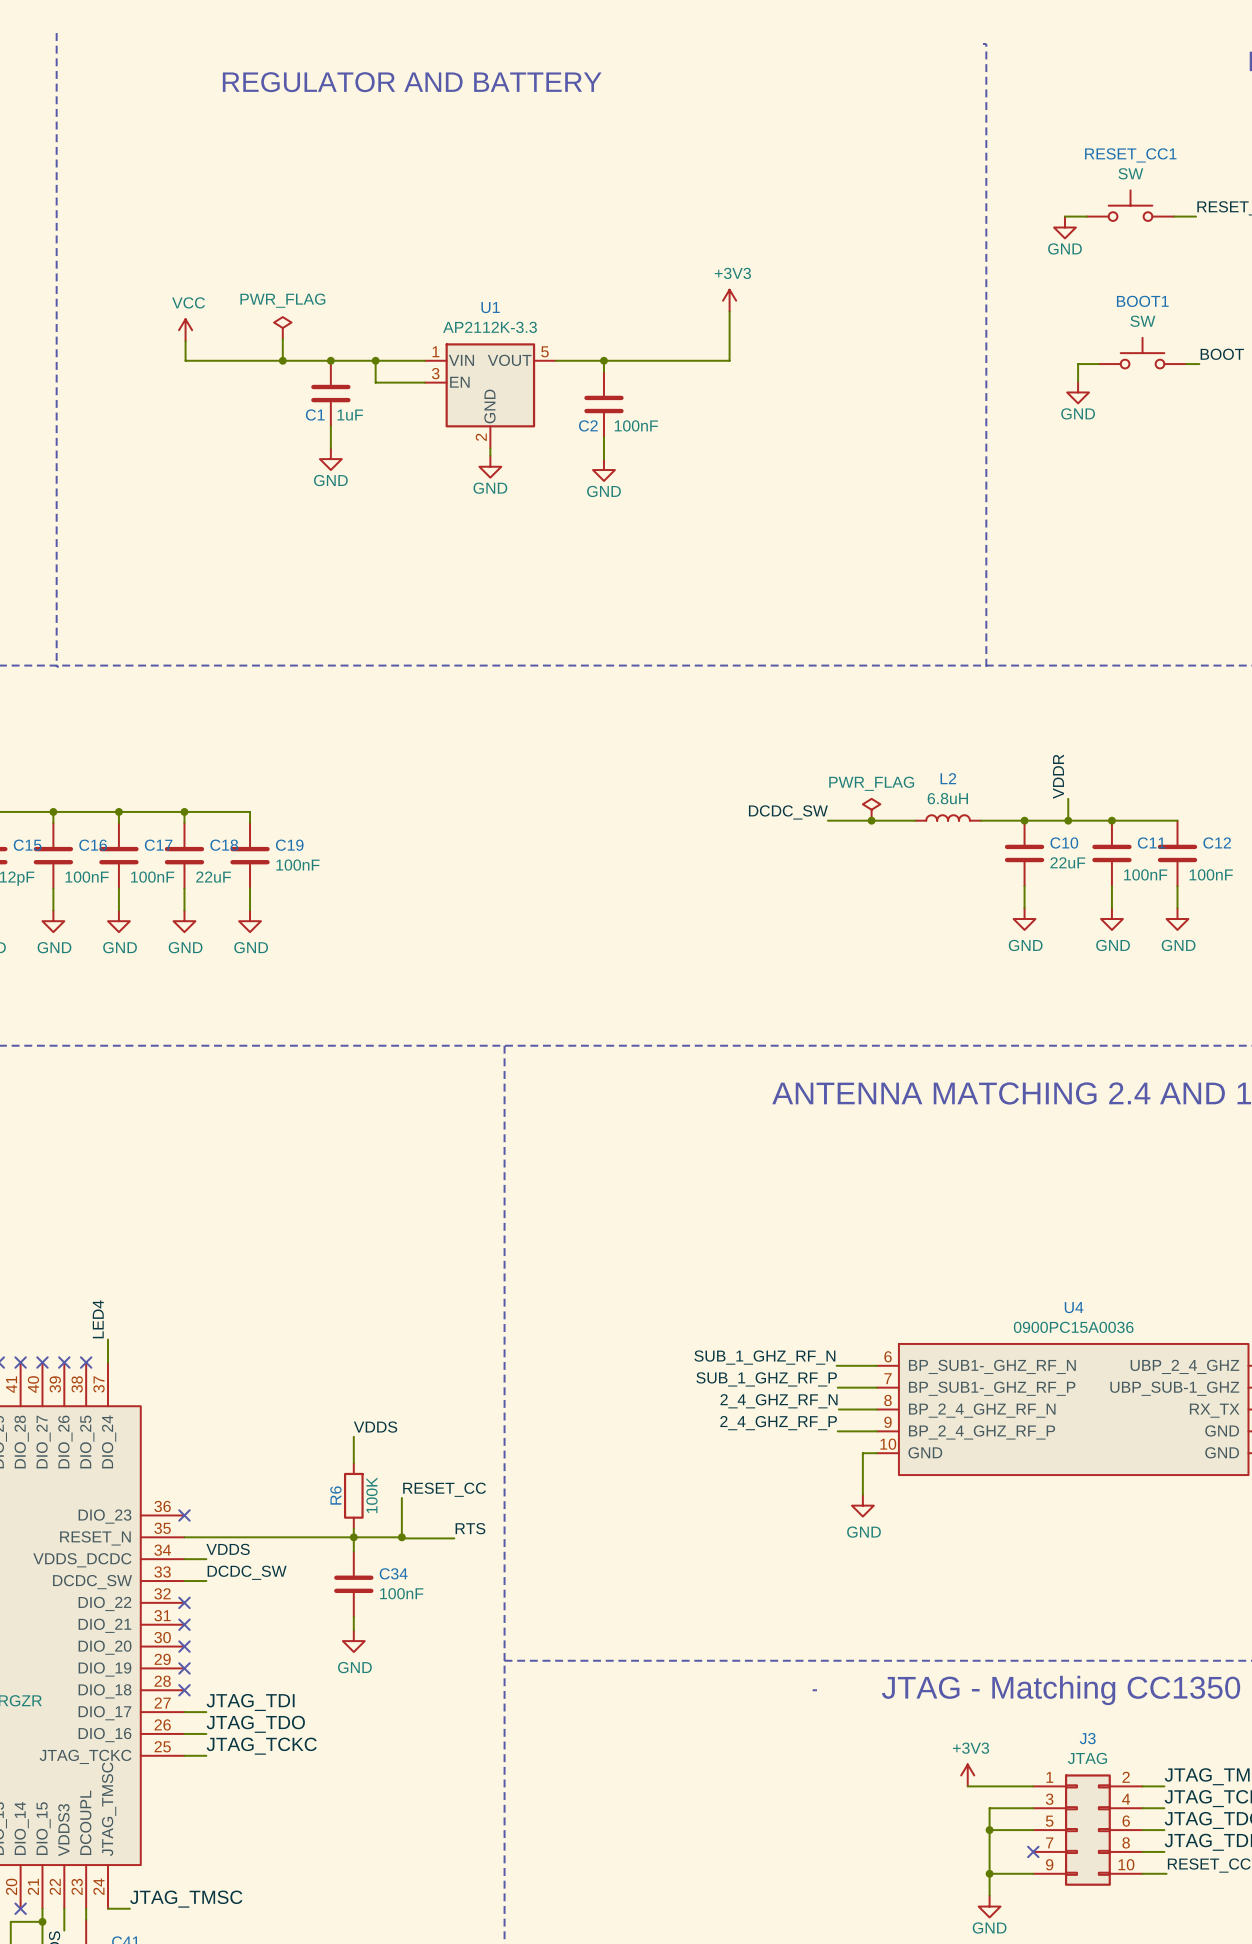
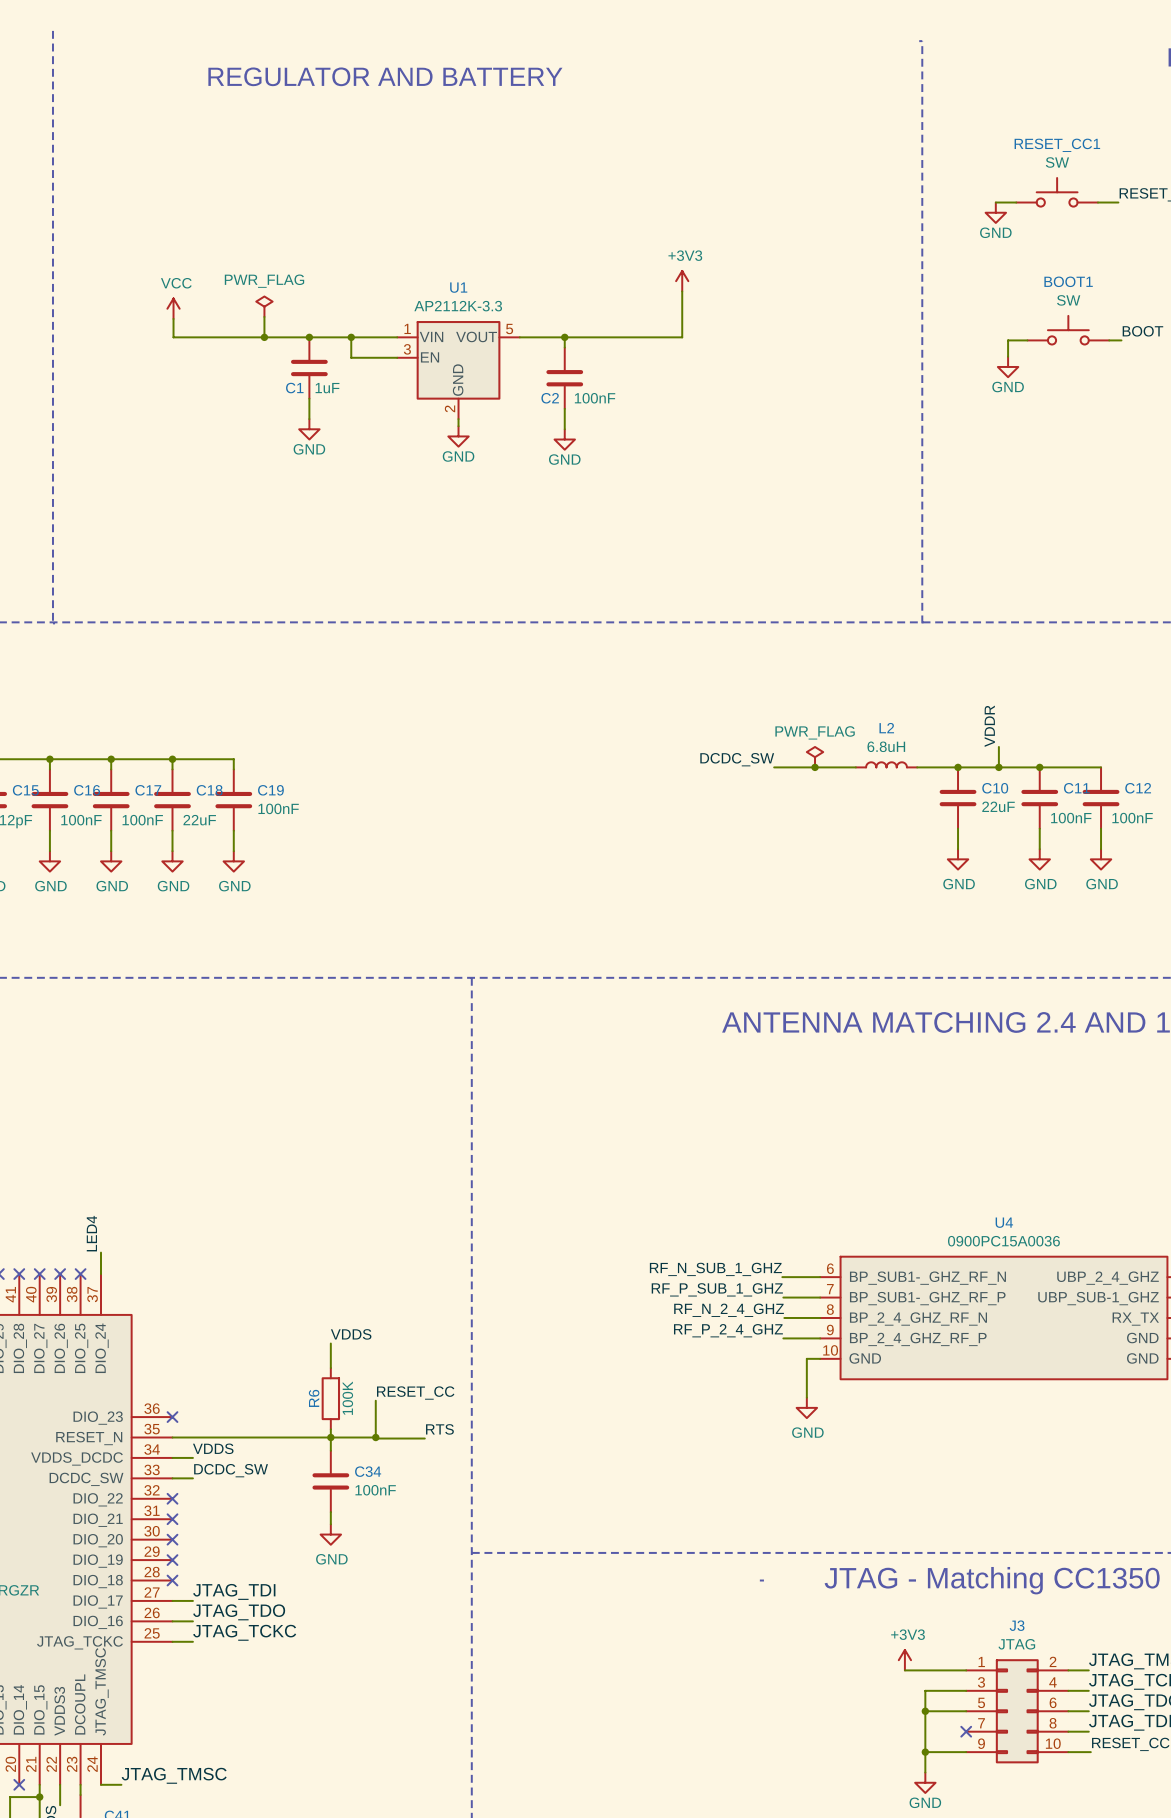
label: SUB_1_GHZ_RF_N (764, 1357) -> RF_N_SUB_1_GHZ (715, 1269)
label: SUB_1_GHZ_RF_P (766, 1379) -> RF_P_SUB_1_GHZ (717, 1289)
label: 2_4_GHZ_RF_N (779, 1401) -> RF_N_2_4_GHZ (729, 1310)
label: 2_4_GHZ_RF_P (778, 1423) -> RF_P_2_4_GHZ (728, 1330)

